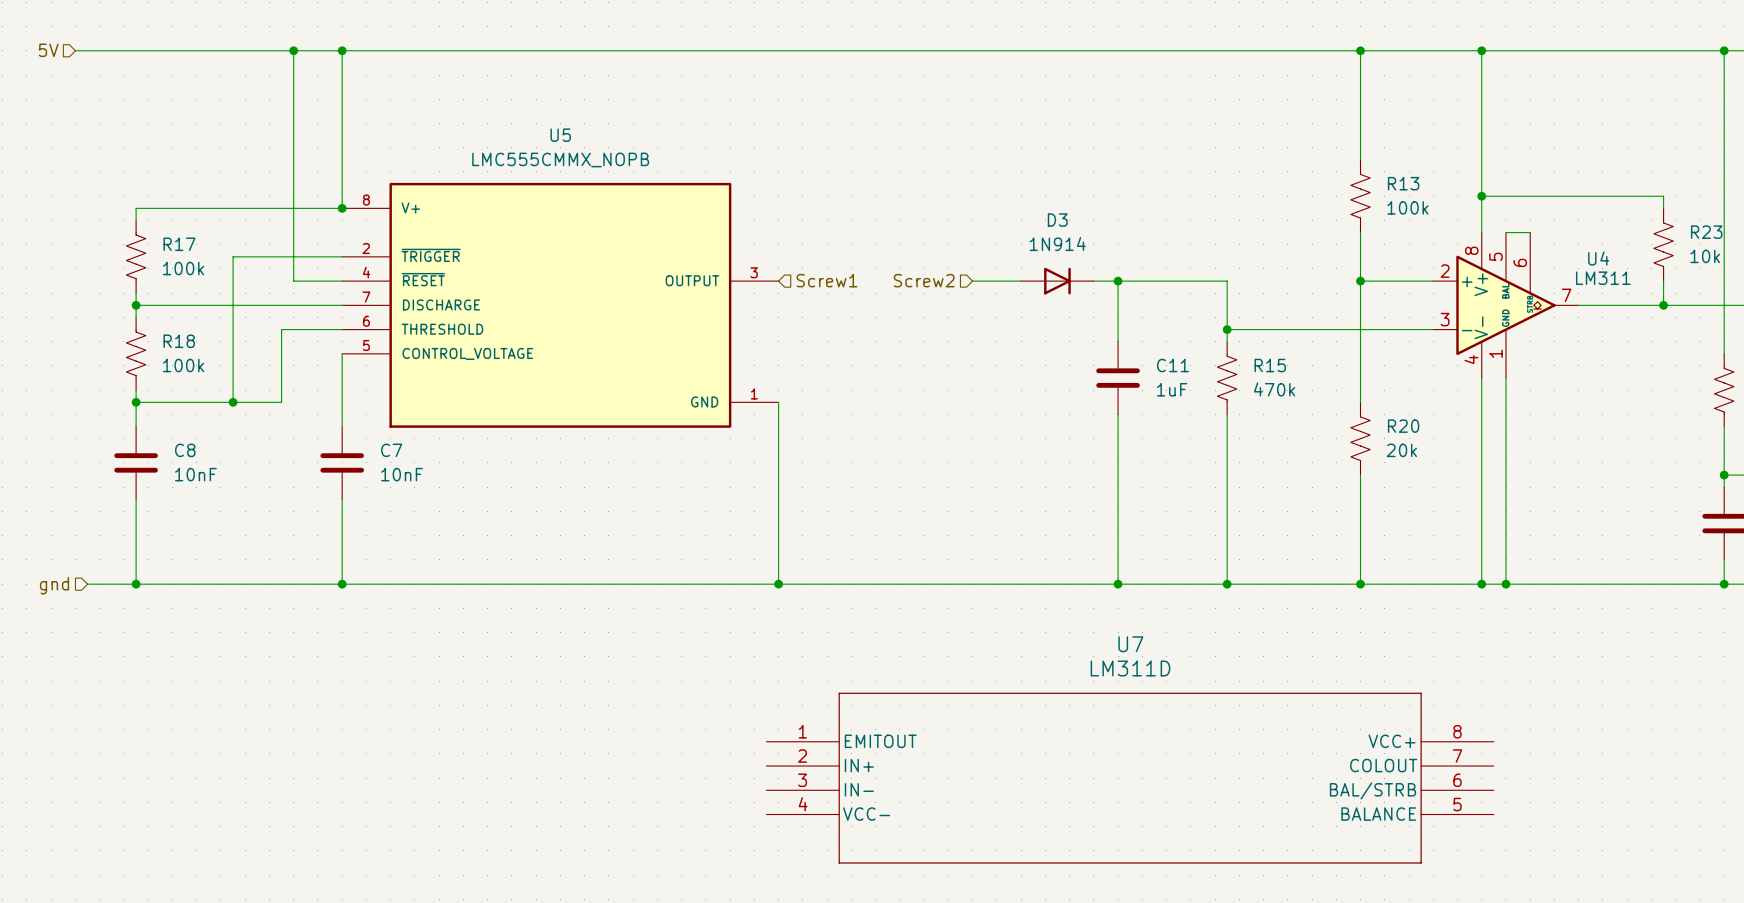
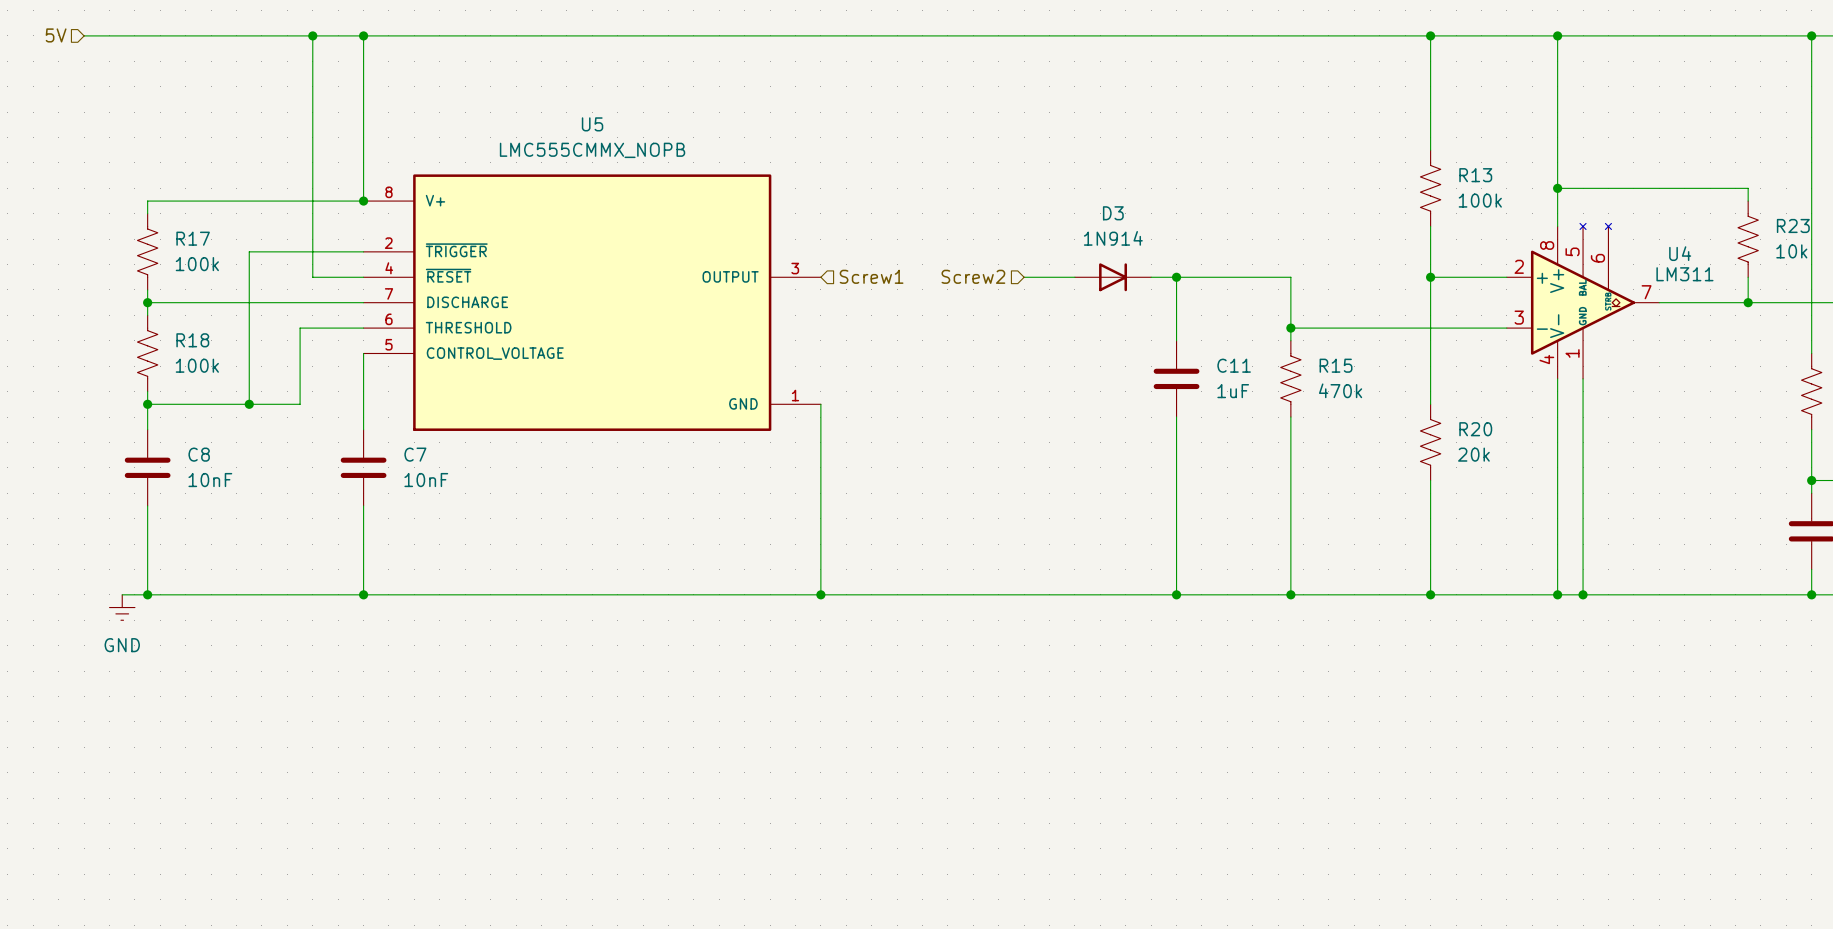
U4 symbol: [1433, 232, 1579, 379] -> [1506, 223, 1660, 379]
wire: (1505, 232) (1530, 232) -> none
wire: (87, 584) (111, 584) -> none
hierarchical label: gnd (54, 585) -> none
power symbol: none -> GND (122, 607)
U7: LM311D (1130, 778) -> none

